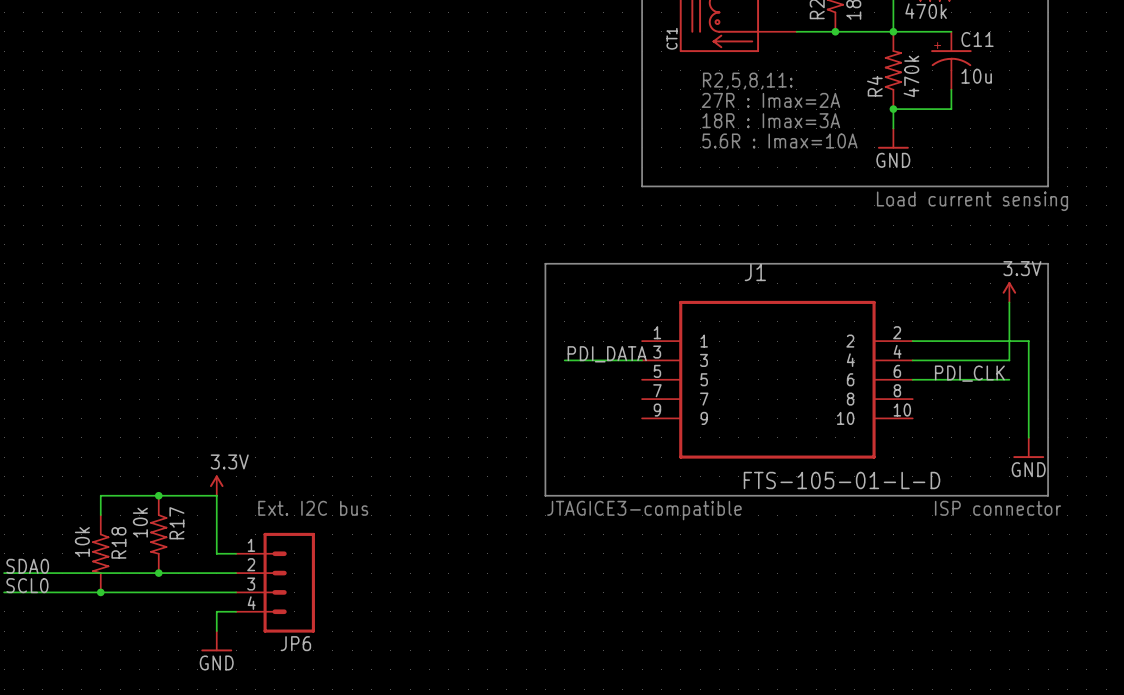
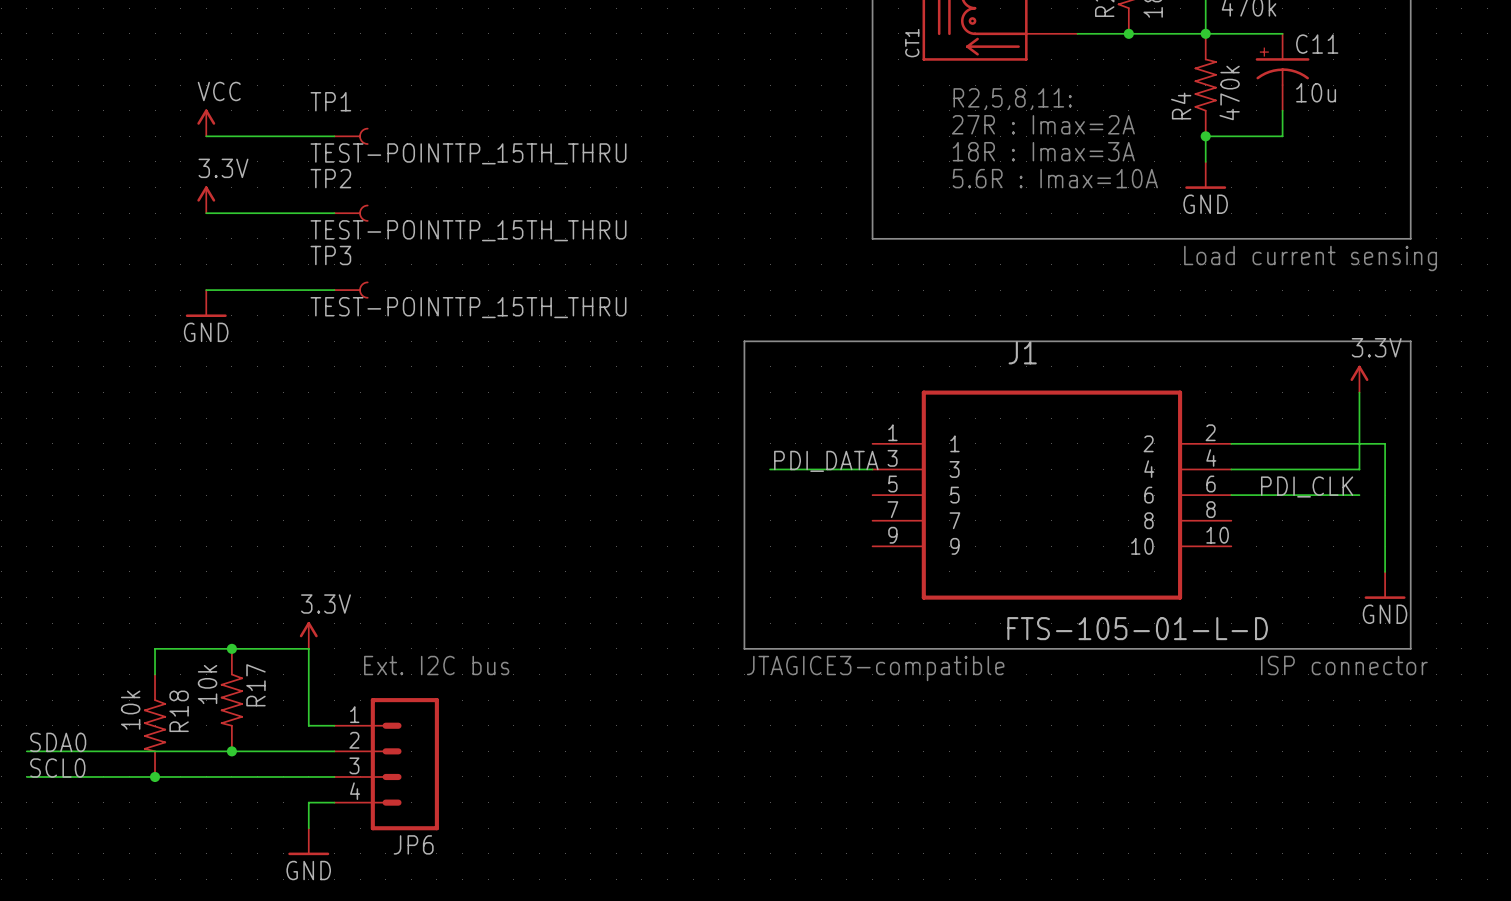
power symbol: none -> VCC (206, 122)
wire: none -> (206, 136) (334, 136)
TP1: none -> TEST-POINTTP_15TH_THRU (351, 136)
power symbol: none -> 3.3V (206, 199)
wire: none -> (206, 213) (334, 213)
TP2: none -> TEST-POINTTP_15TH_THRU (351, 213)
wire: none -> (206, 290) (334, 290)
TP3: none -> TEST-POINTTP_15TH_THRU (351, 290)
power symbol: none -> GND (206, 303)

